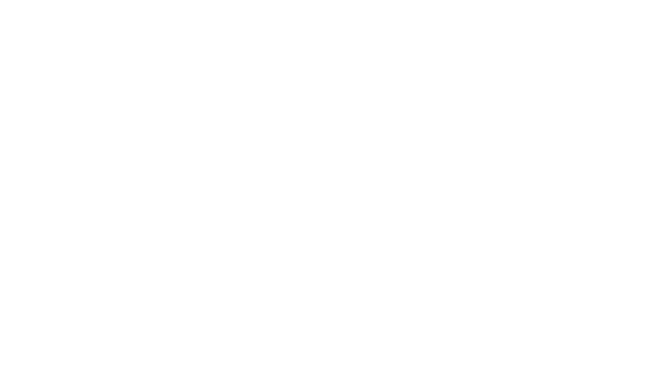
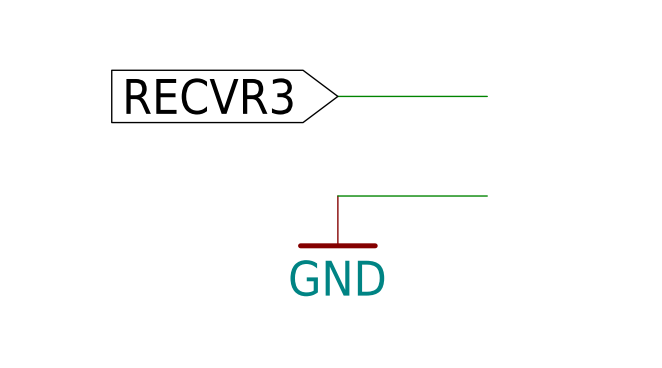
global label: none -> RECVR3 (209, 96)
wire: none -> (337, 96) (487, 96)
wire: none -> (337, 196) (487, 196)
power symbol: none -> GND (337, 222)

